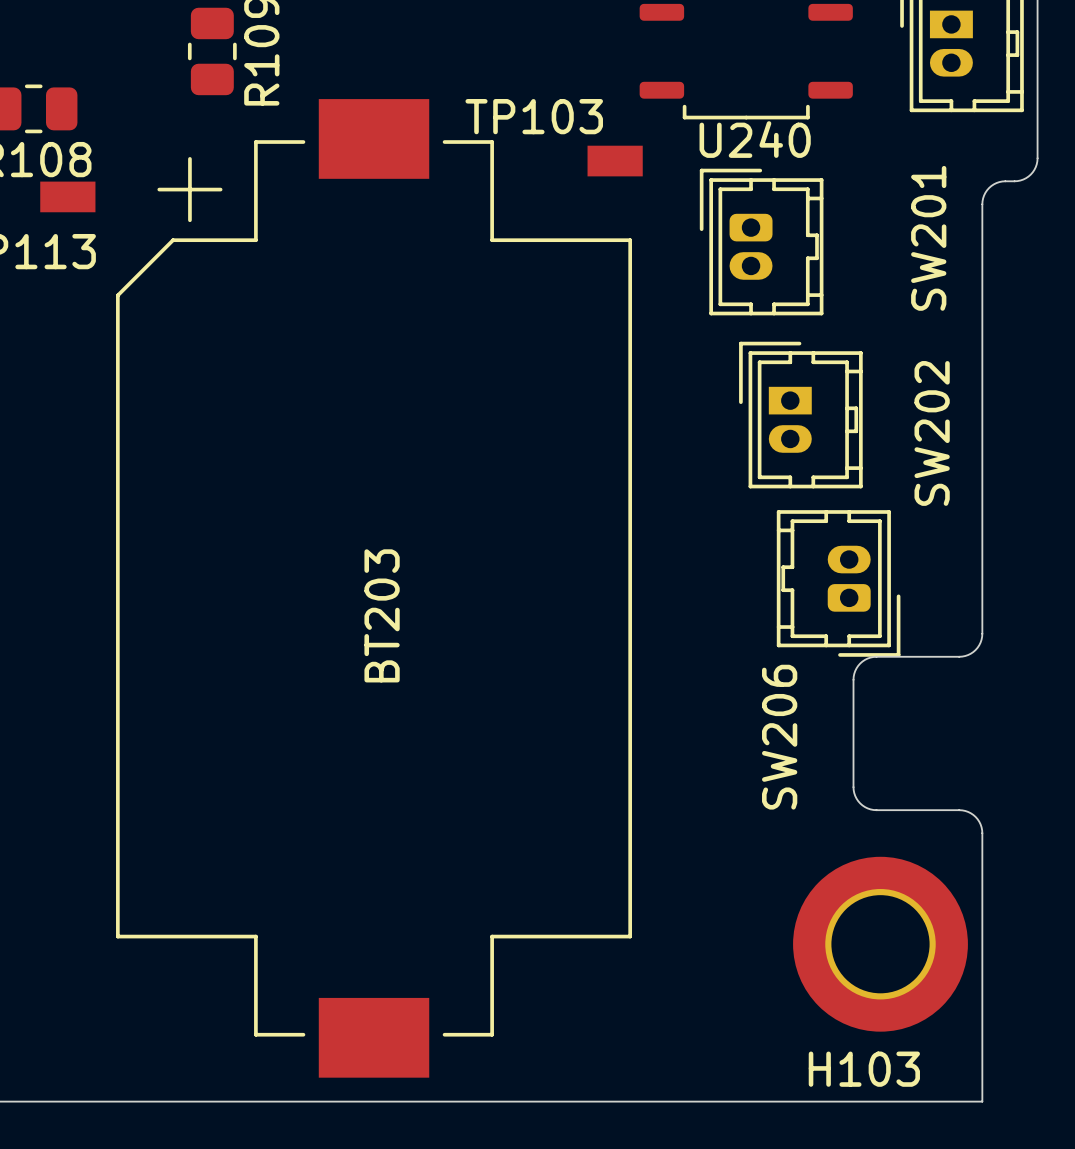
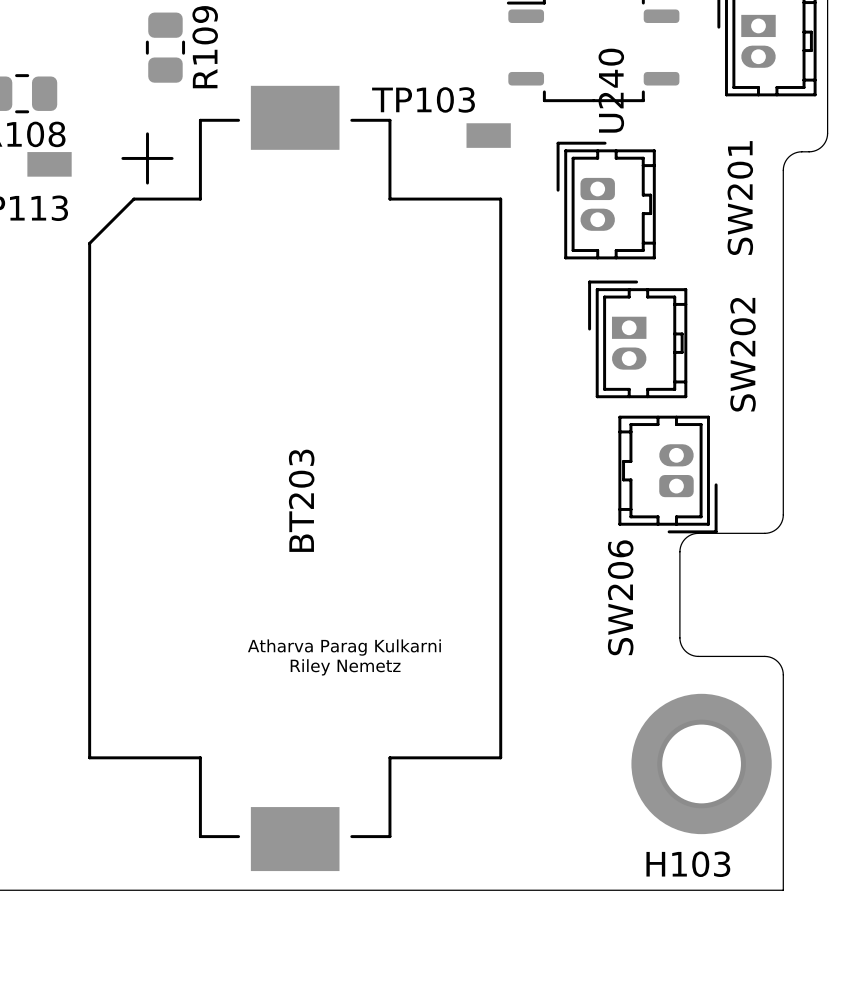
U240 name rotation: 0° (755, 139) -> 90° counterclockwise (611, 90)
text: none -> Atharva Parag Kulkarni (344, 647)
text: none -> Riley Nemetz (345, 667)

